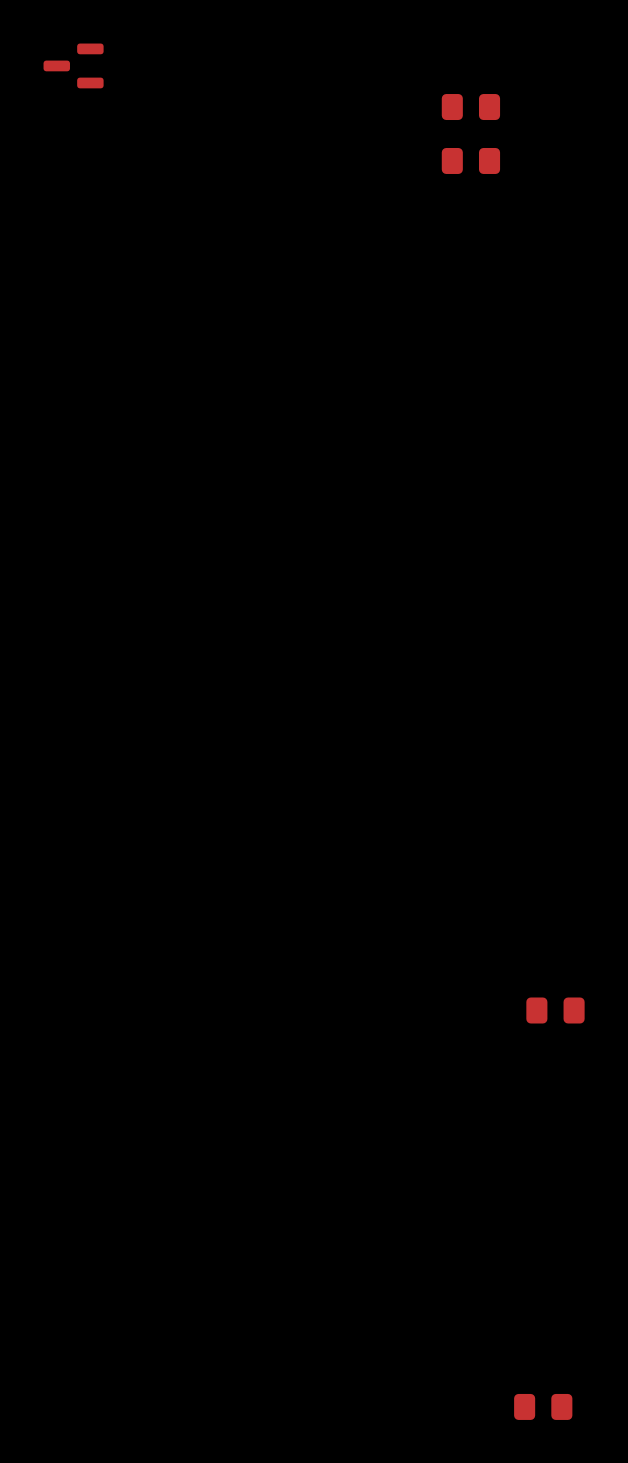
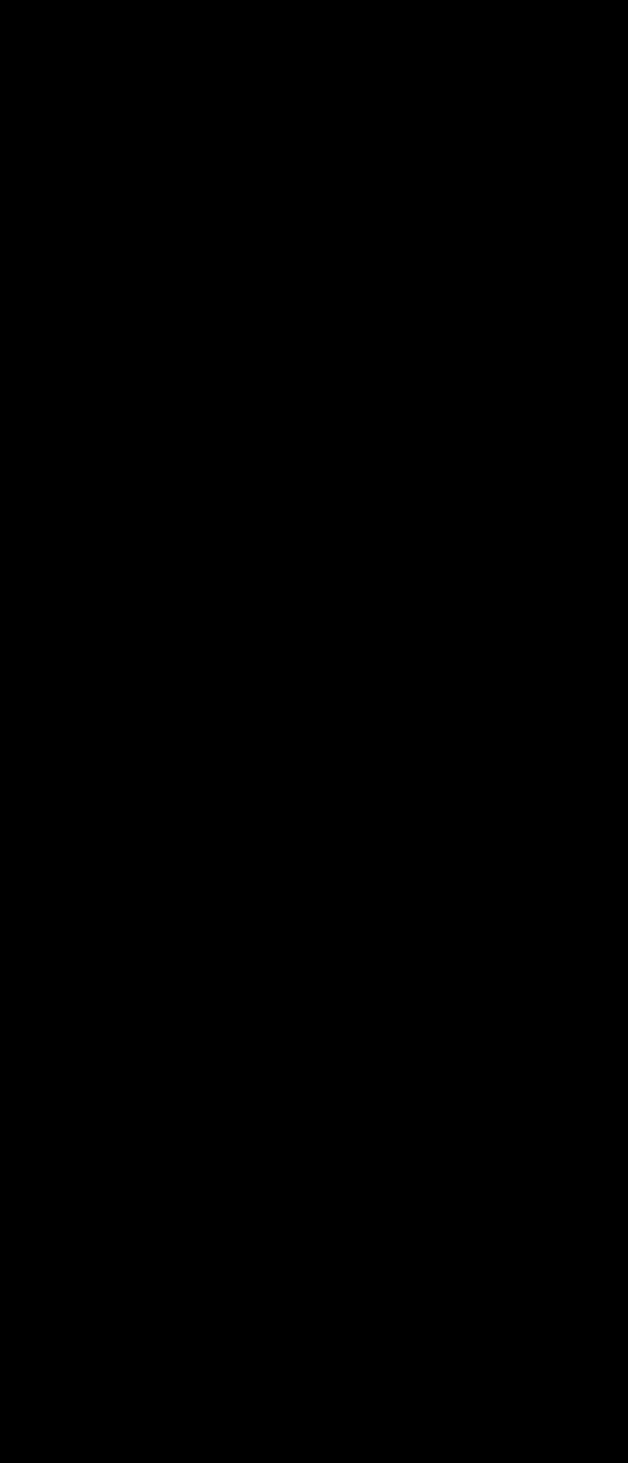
part: (73, 65) -> none
part: (470, 107) -> none
part: (470, 160) -> none
part: (555, 1010) -> none
part: (543, 1406) -> none

